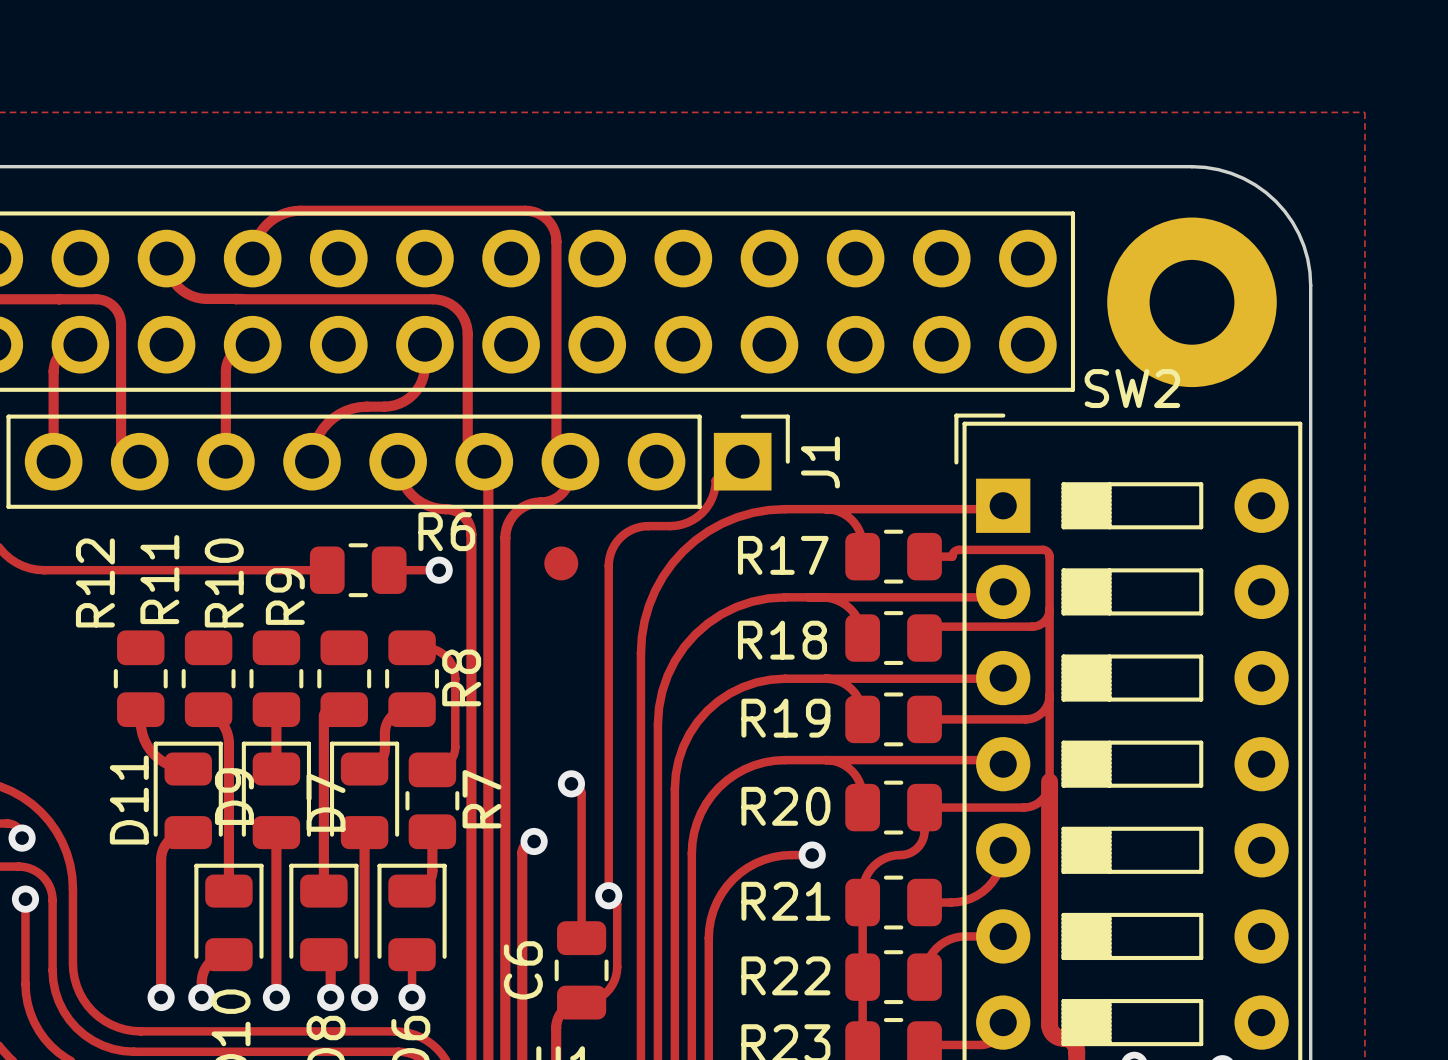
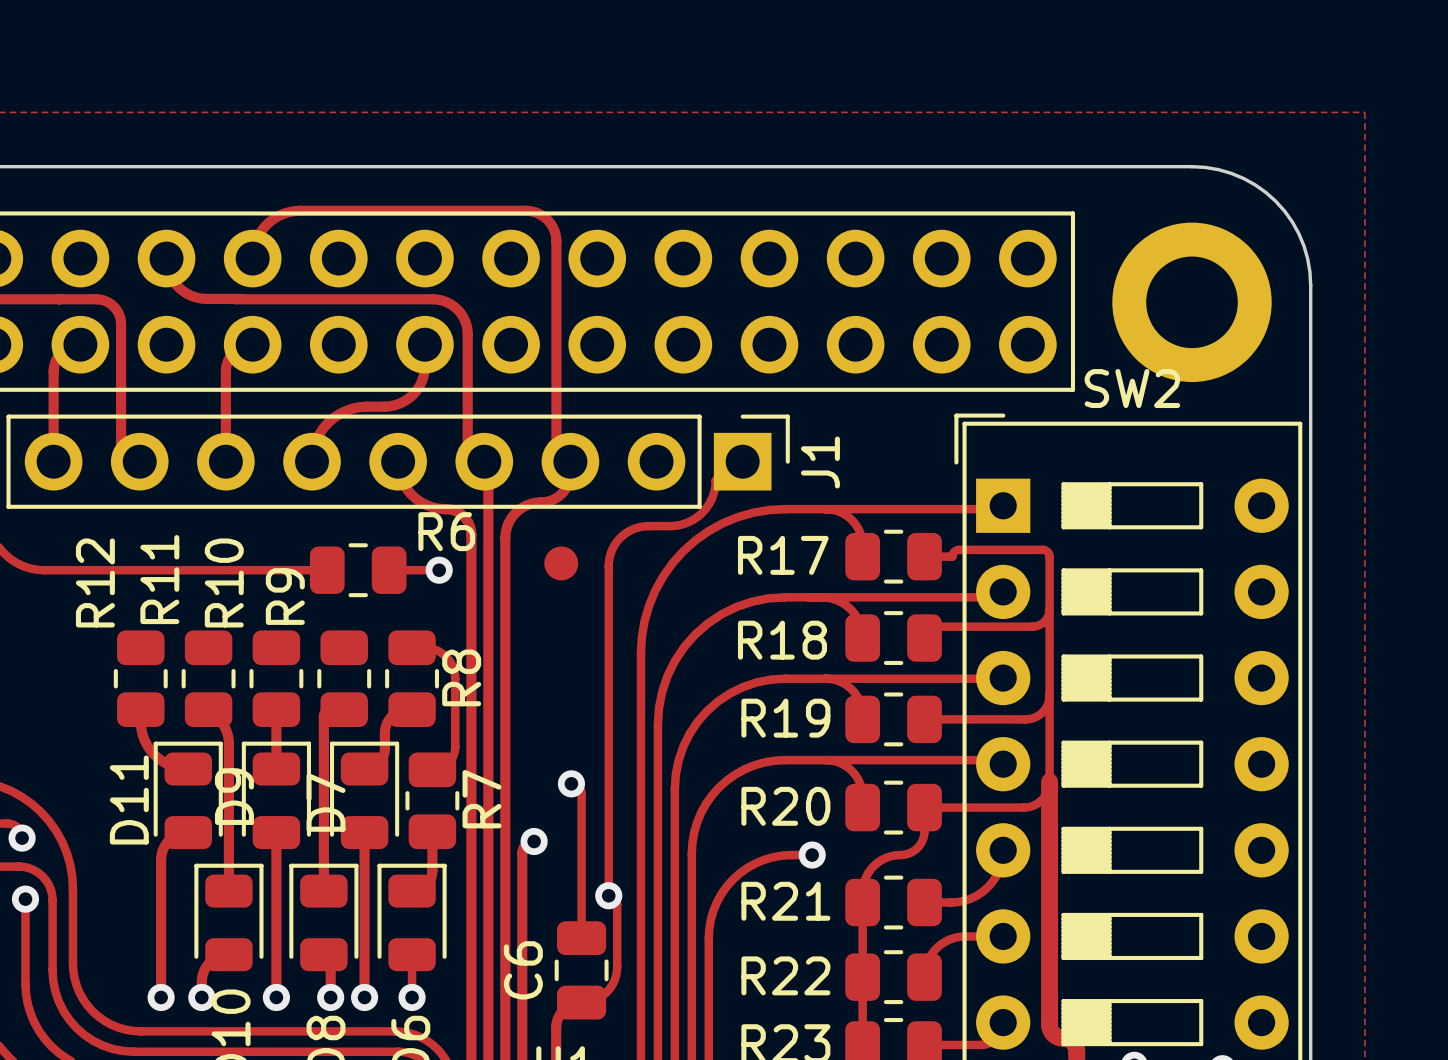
part footprint: [1107, 217, 1277, 388] -> [1112, 222, 1272, 383]

